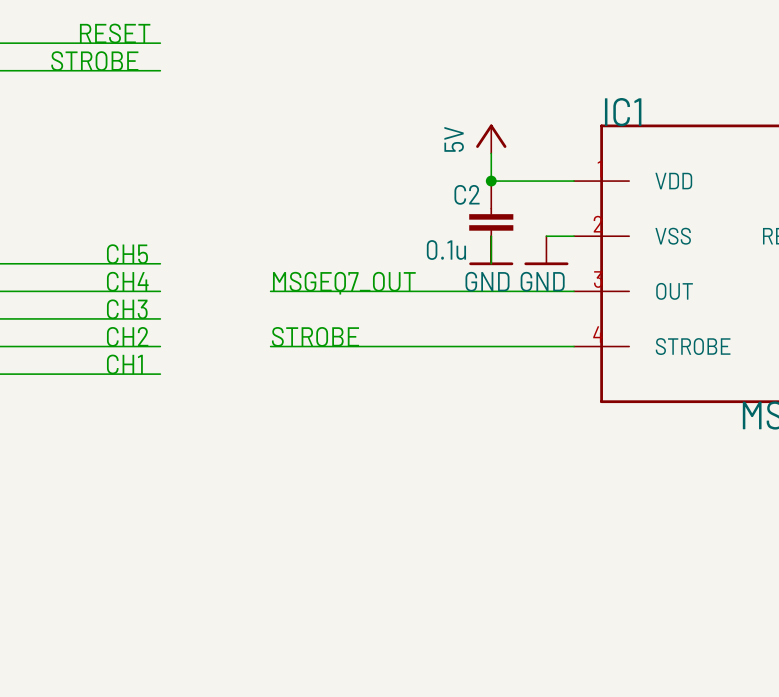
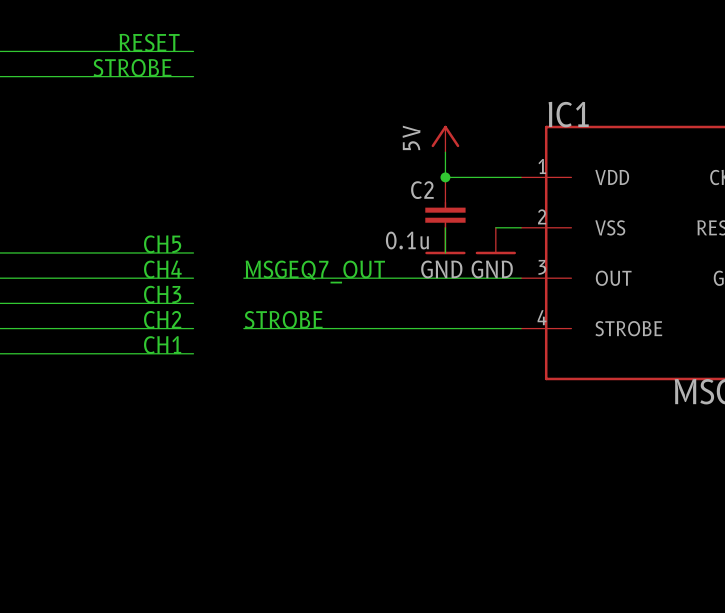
text position: RESET (115, 33) -> RESET (149, 42)
wire: none -> (143, 51) (193, 51)
text position: STROBE (94, 61) -> STROBE (132, 67)
wire: none -> (143, 76) (193, 76)
text position: CH5 (127, 254) -> CH5 (162, 244)
wire: none -> (143, 252) (193, 252)
text position: CH4 (127, 281) -> CH4 (162, 269)
wire: none -> (143, 278) (193, 278)
text position: CH3 (127, 309) -> CH3 (162, 294)
wire: none -> (143, 303) (193, 303)
text position: CH2 (127, 336) -> CH2 (162, 319)
wire: none -> (143, 328) (193, 328)
text position: CH1 (124, 364) -> CH1 (162, 345)
wire: none -> (143, 353) (193, 353)

